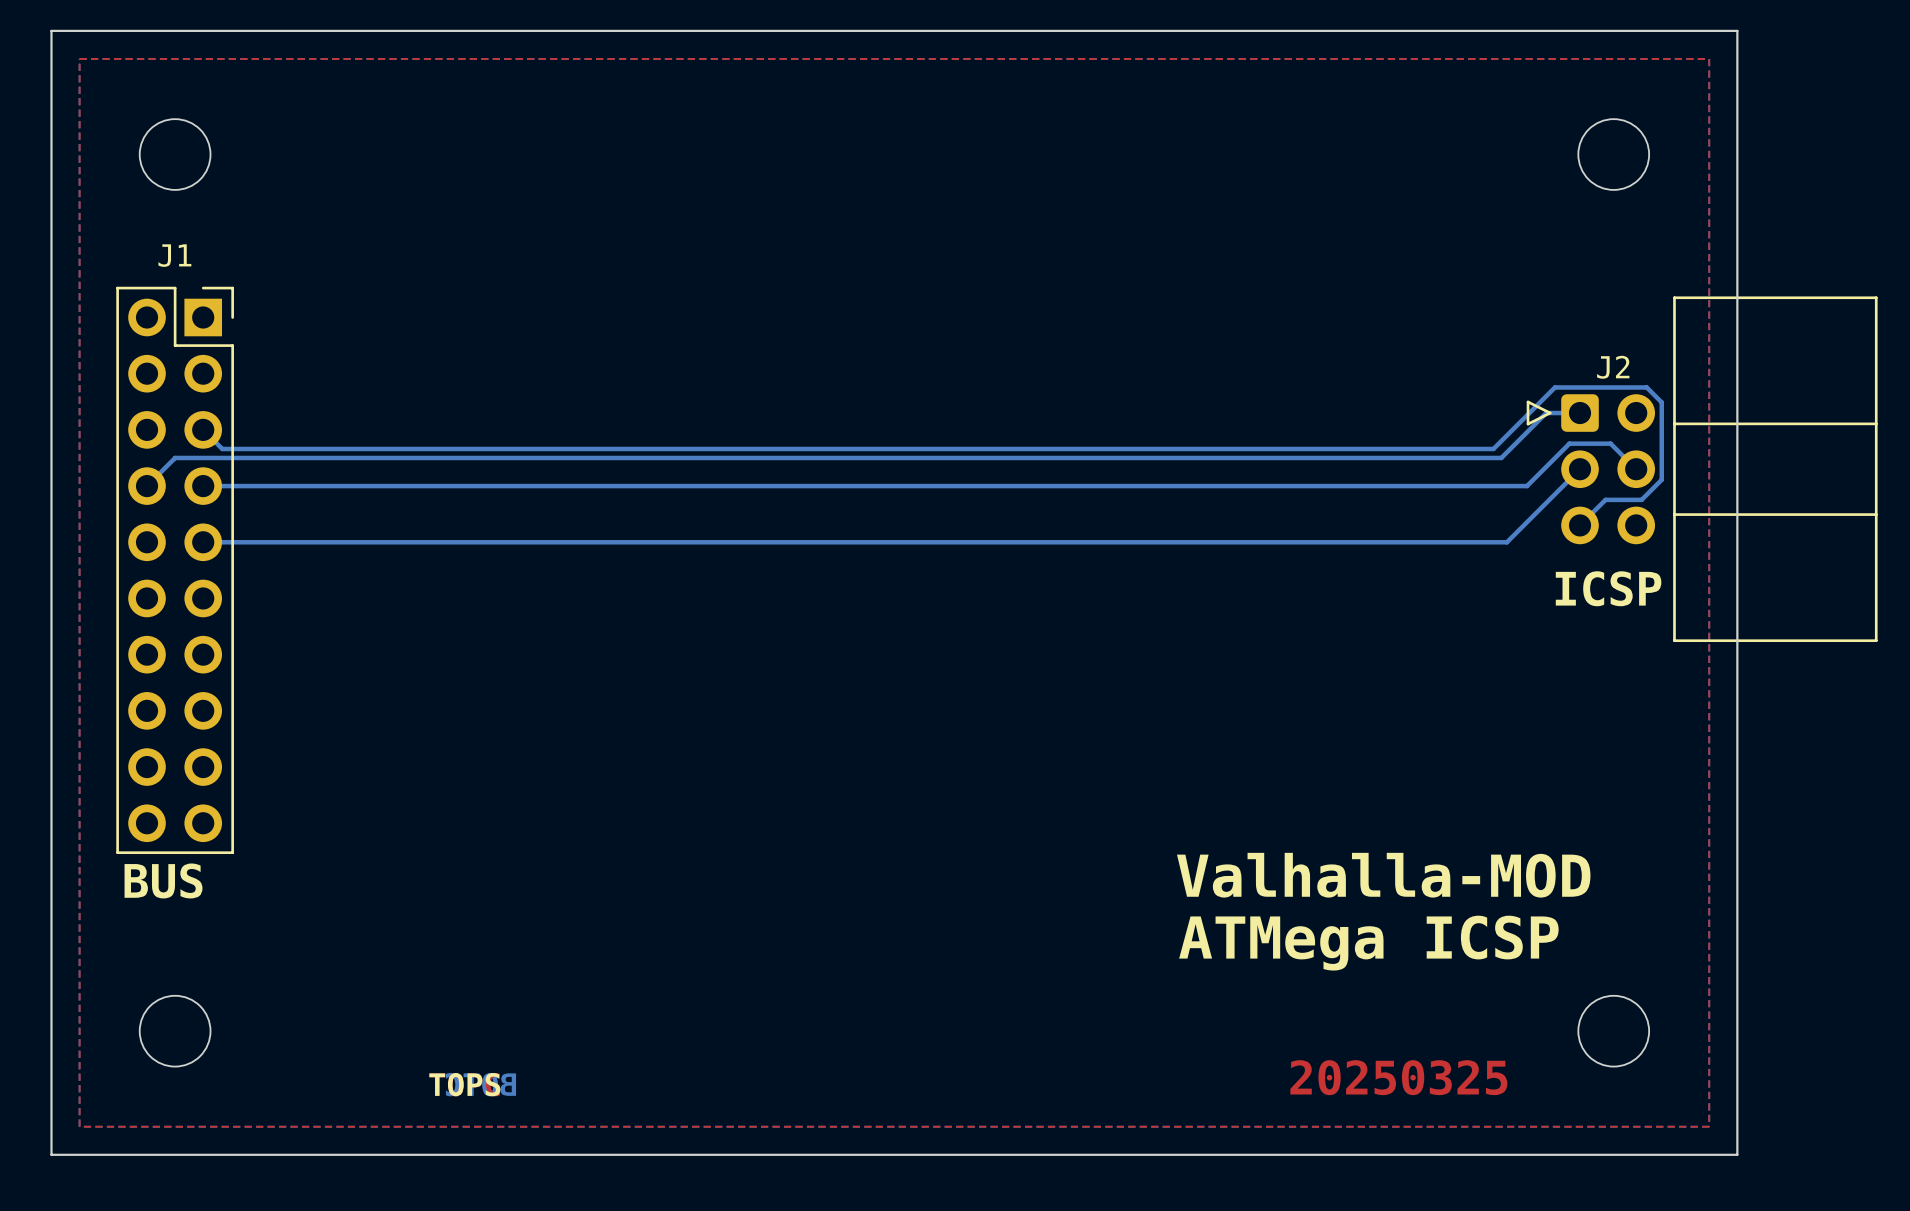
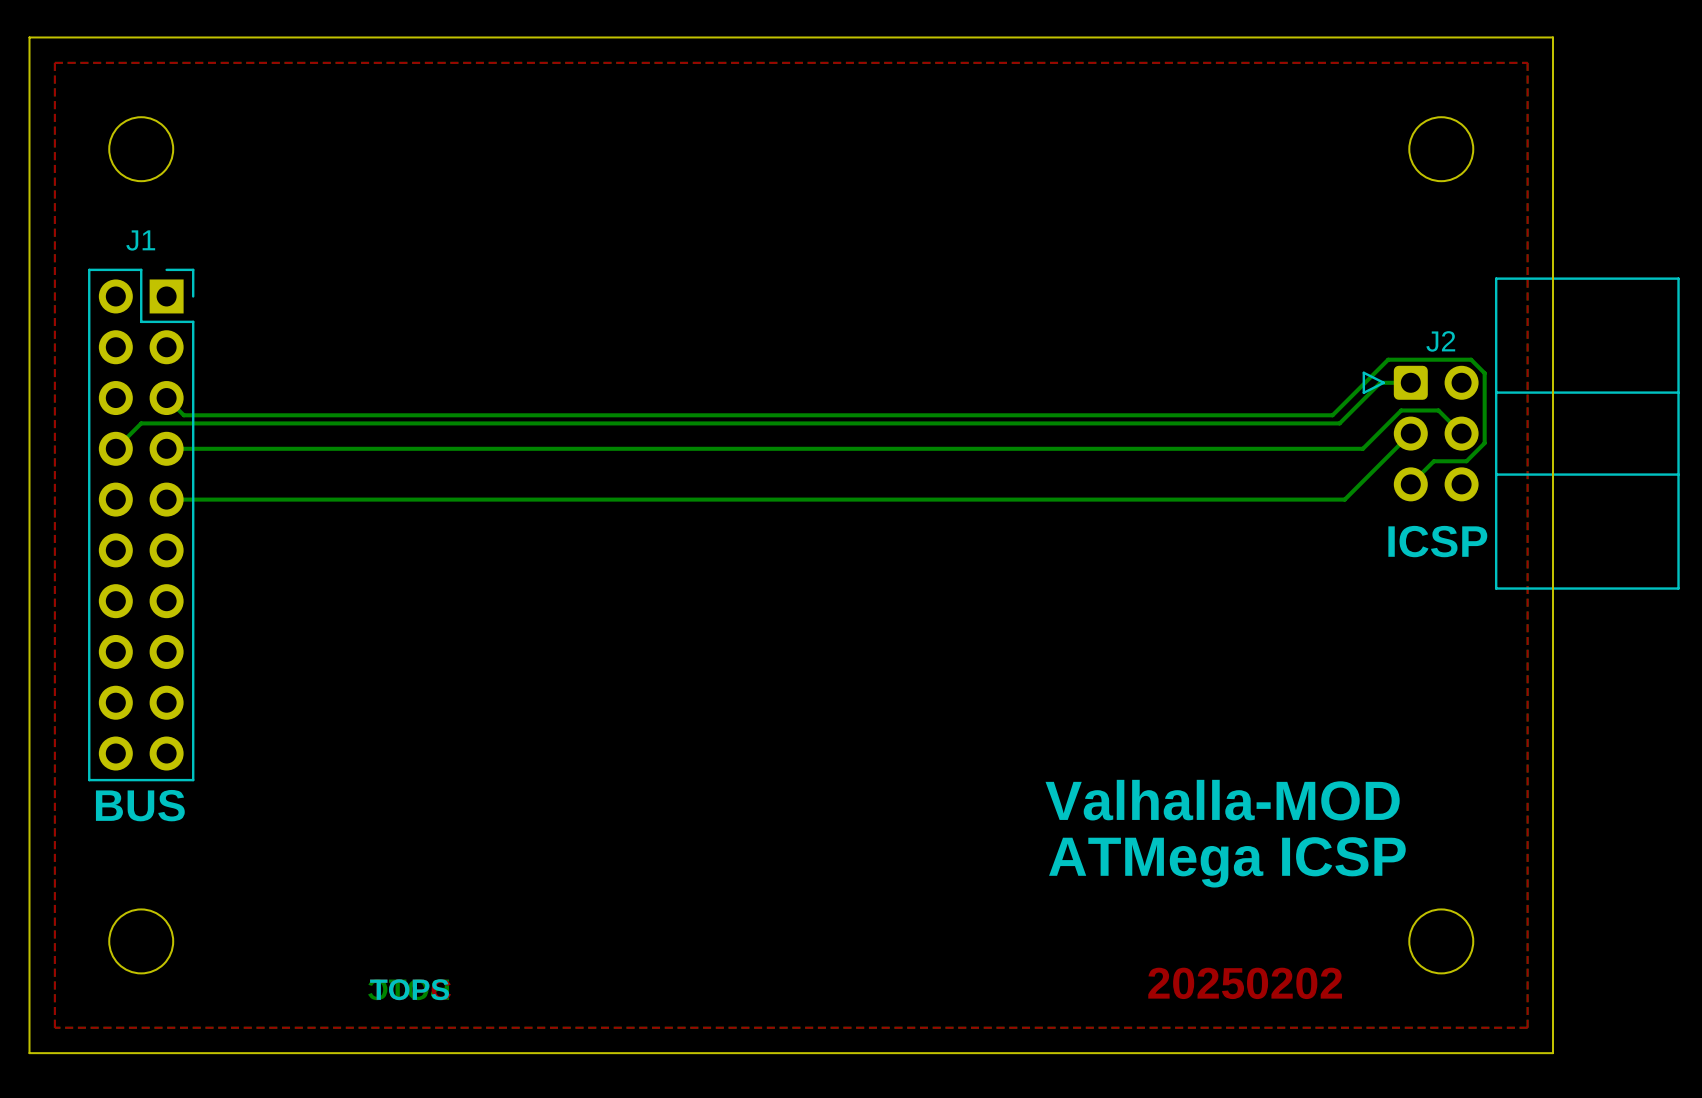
text: 20250325 (1398, 1077) -> 20250202 (1245, 983)

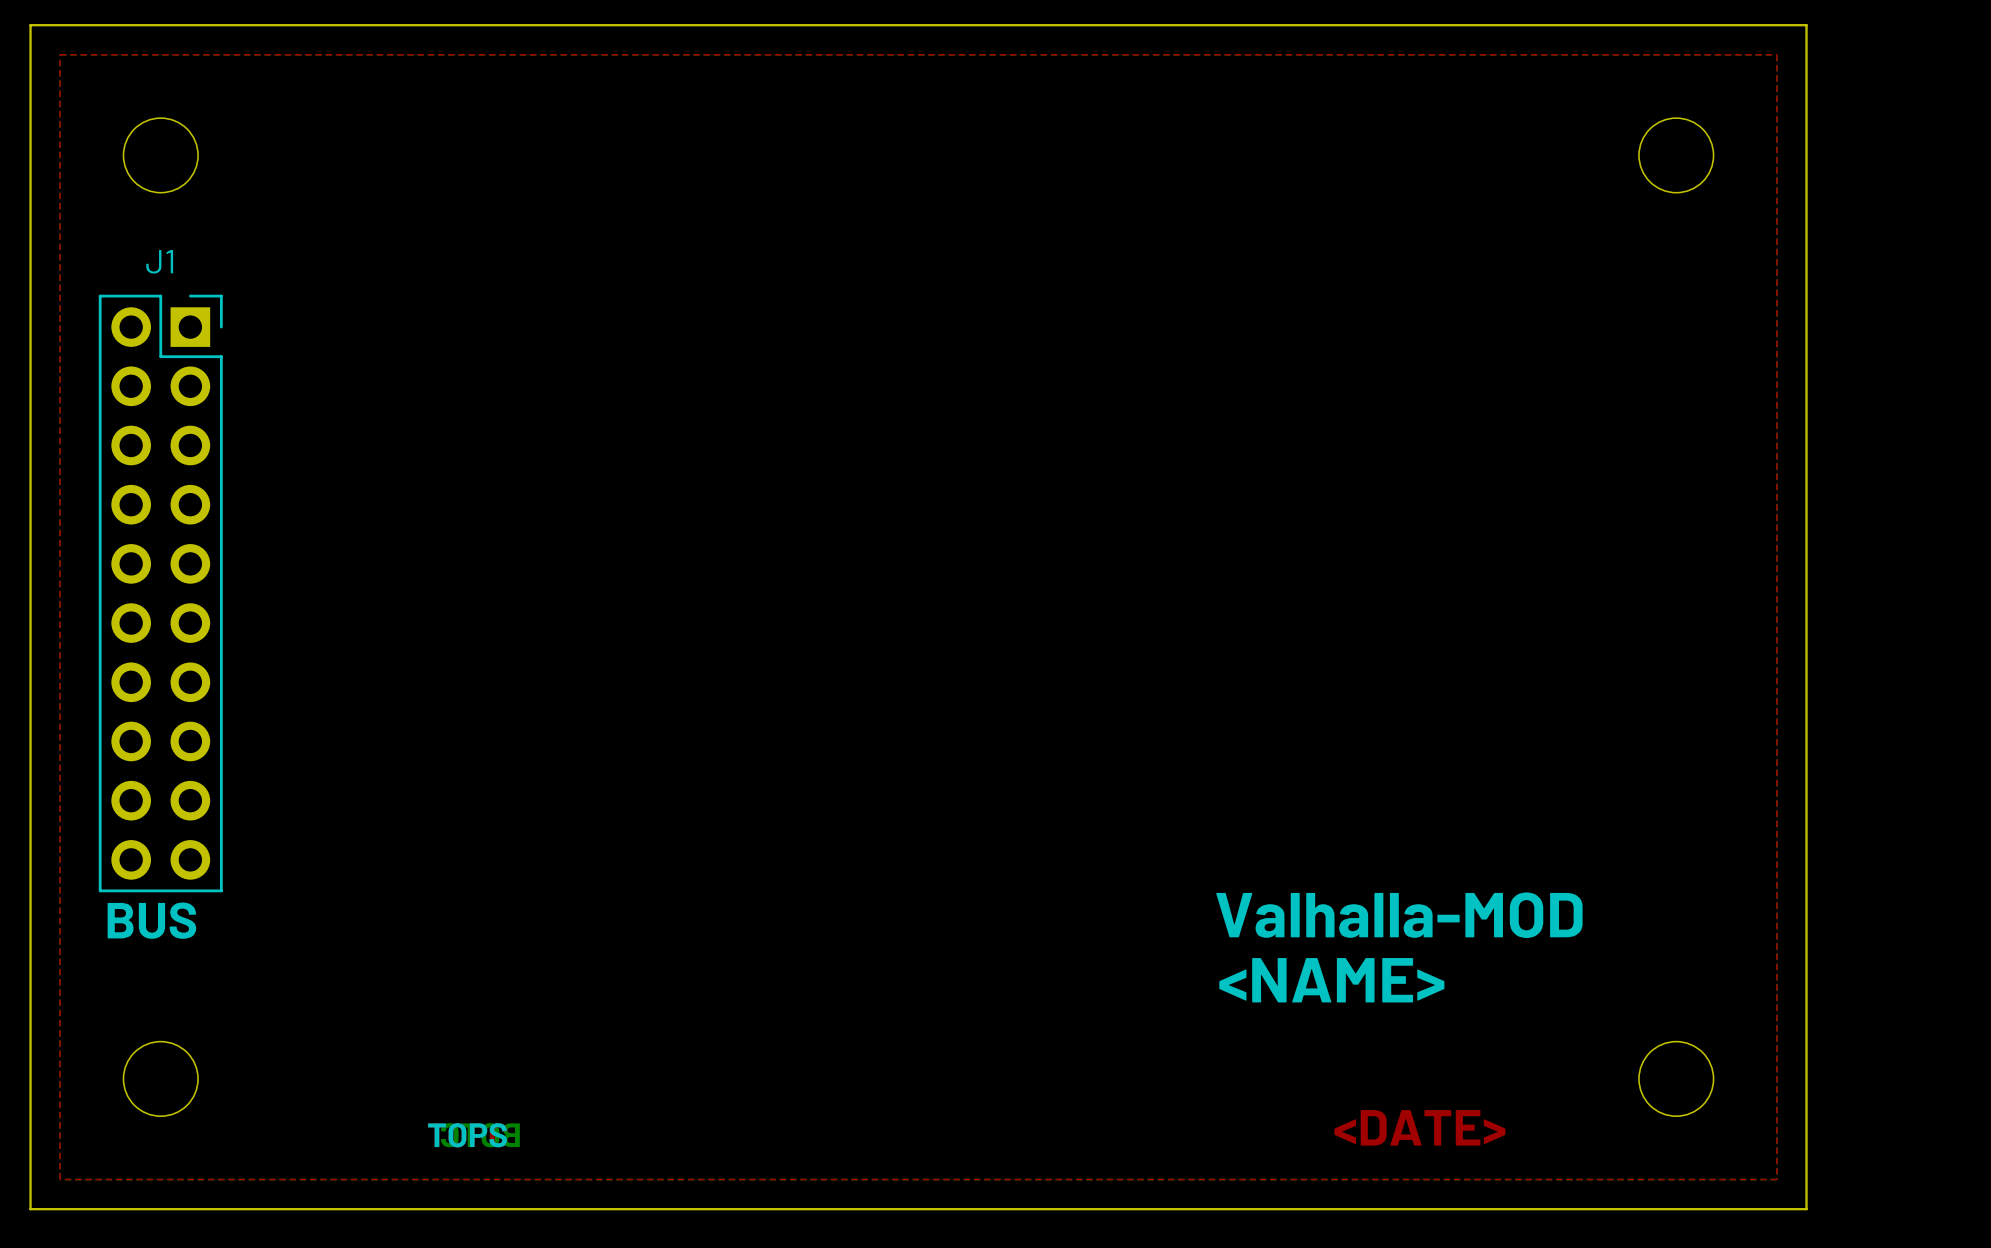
bottom track: (1410, 382) (1380, 382) (1339, 423) (141, 423) (115, 448) -> none
bottom track: (166, 398) (183, 415) (1332, 415) (1388, 359) (1471, 359) (1484, 373) (1484, 443) (1466, 461) (1433, 461) (1410, 484) -> none
bottom track: (1410, 433) (1344, 499) (166, 499) -> none
bottom track: (1461, 433) (1438, 410) (1401, 410) (1362, 448) (166, 448) -> none
J2: (1521, 433) -> none
text: ICSP (1437, 541) -> none
text: ATMega ICSP (1227, 862) -> <NAME> (1331, 980)
text: 20250202 (1245, 983) -> <DATE> (1419, 1127)

